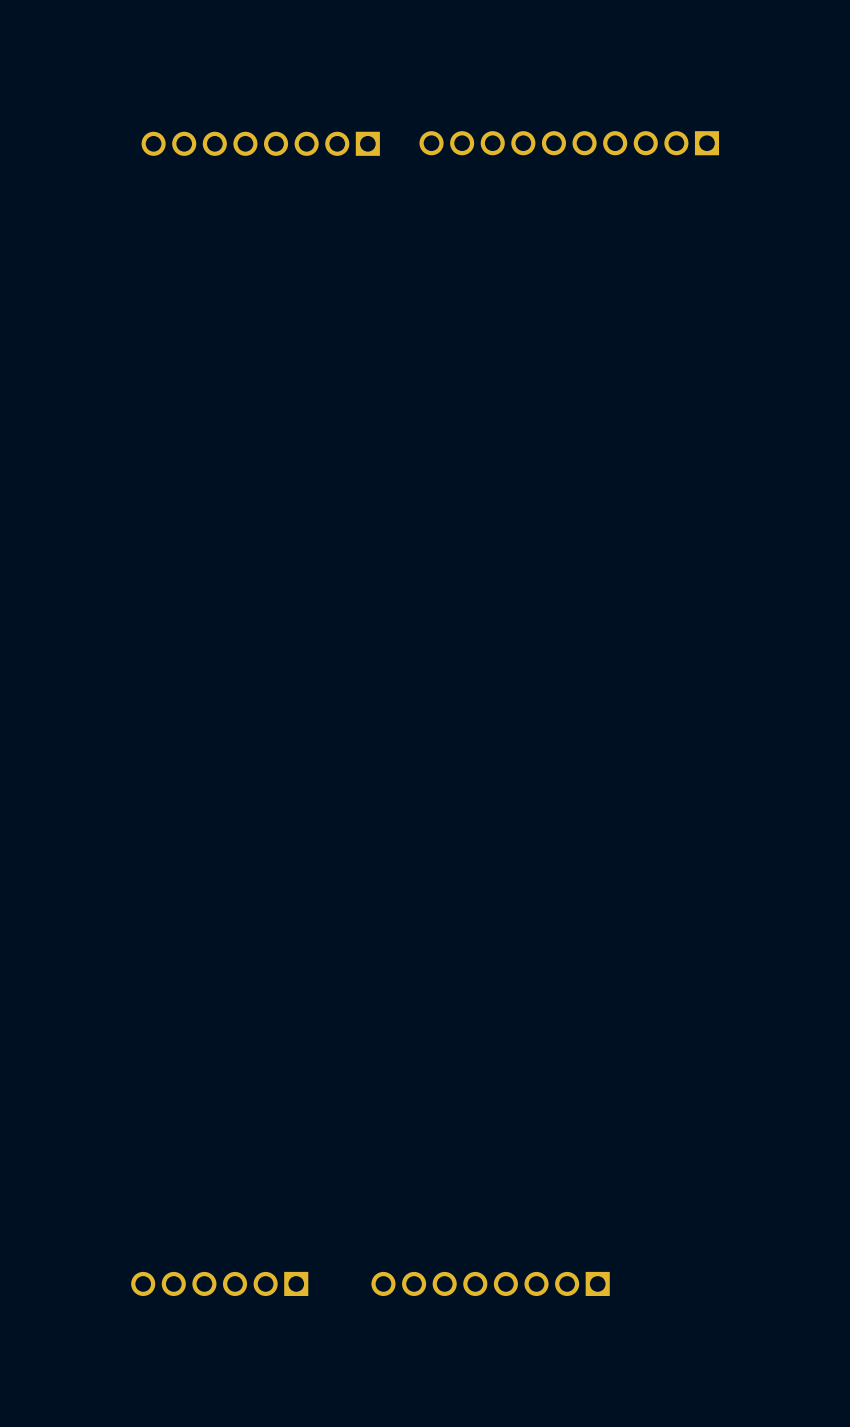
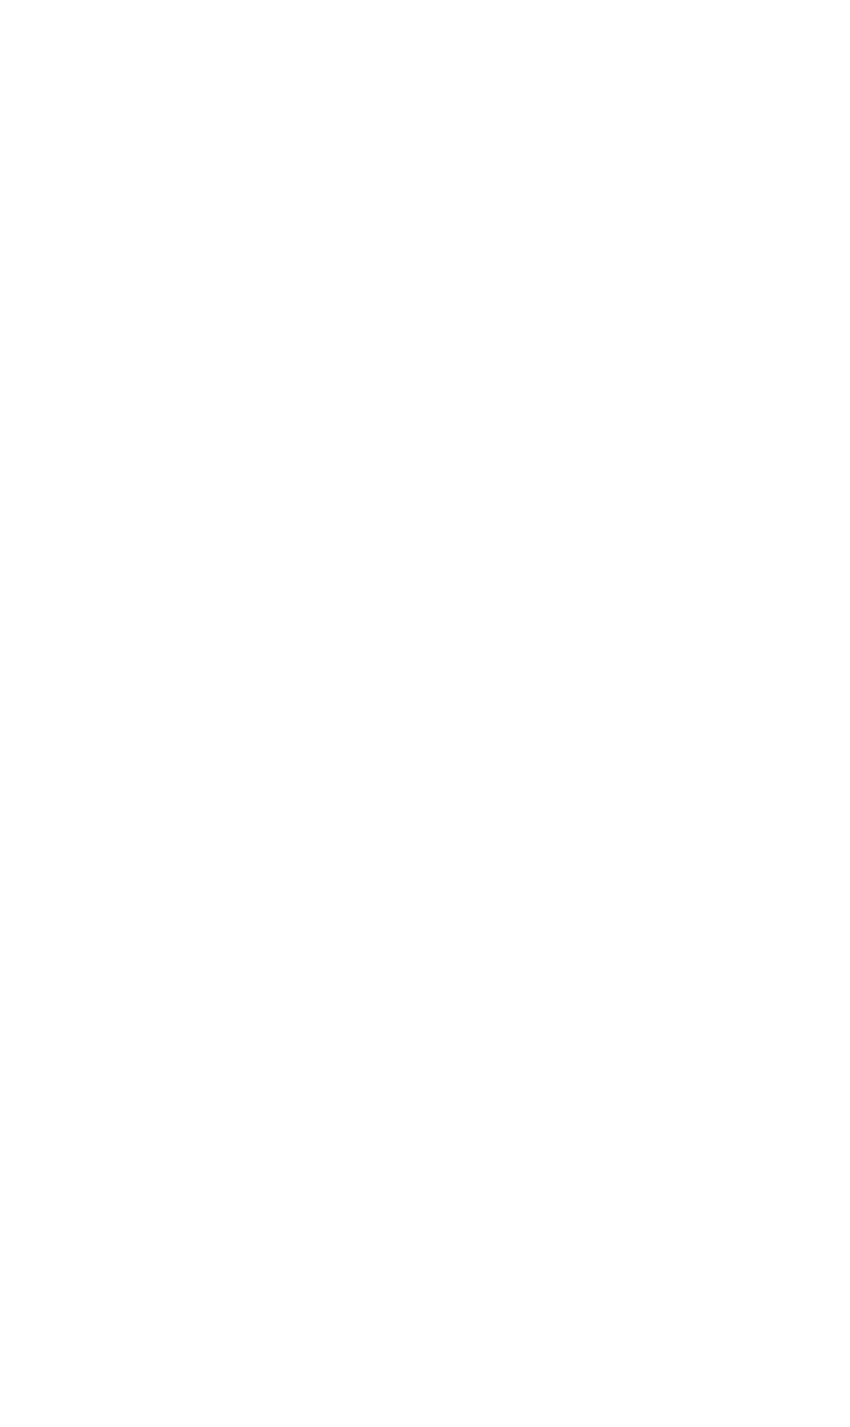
part: (260, 143) -> none
part: (569, 143) -> none
part: (219, 1283) -> none
part: (490, 1283) -> none

